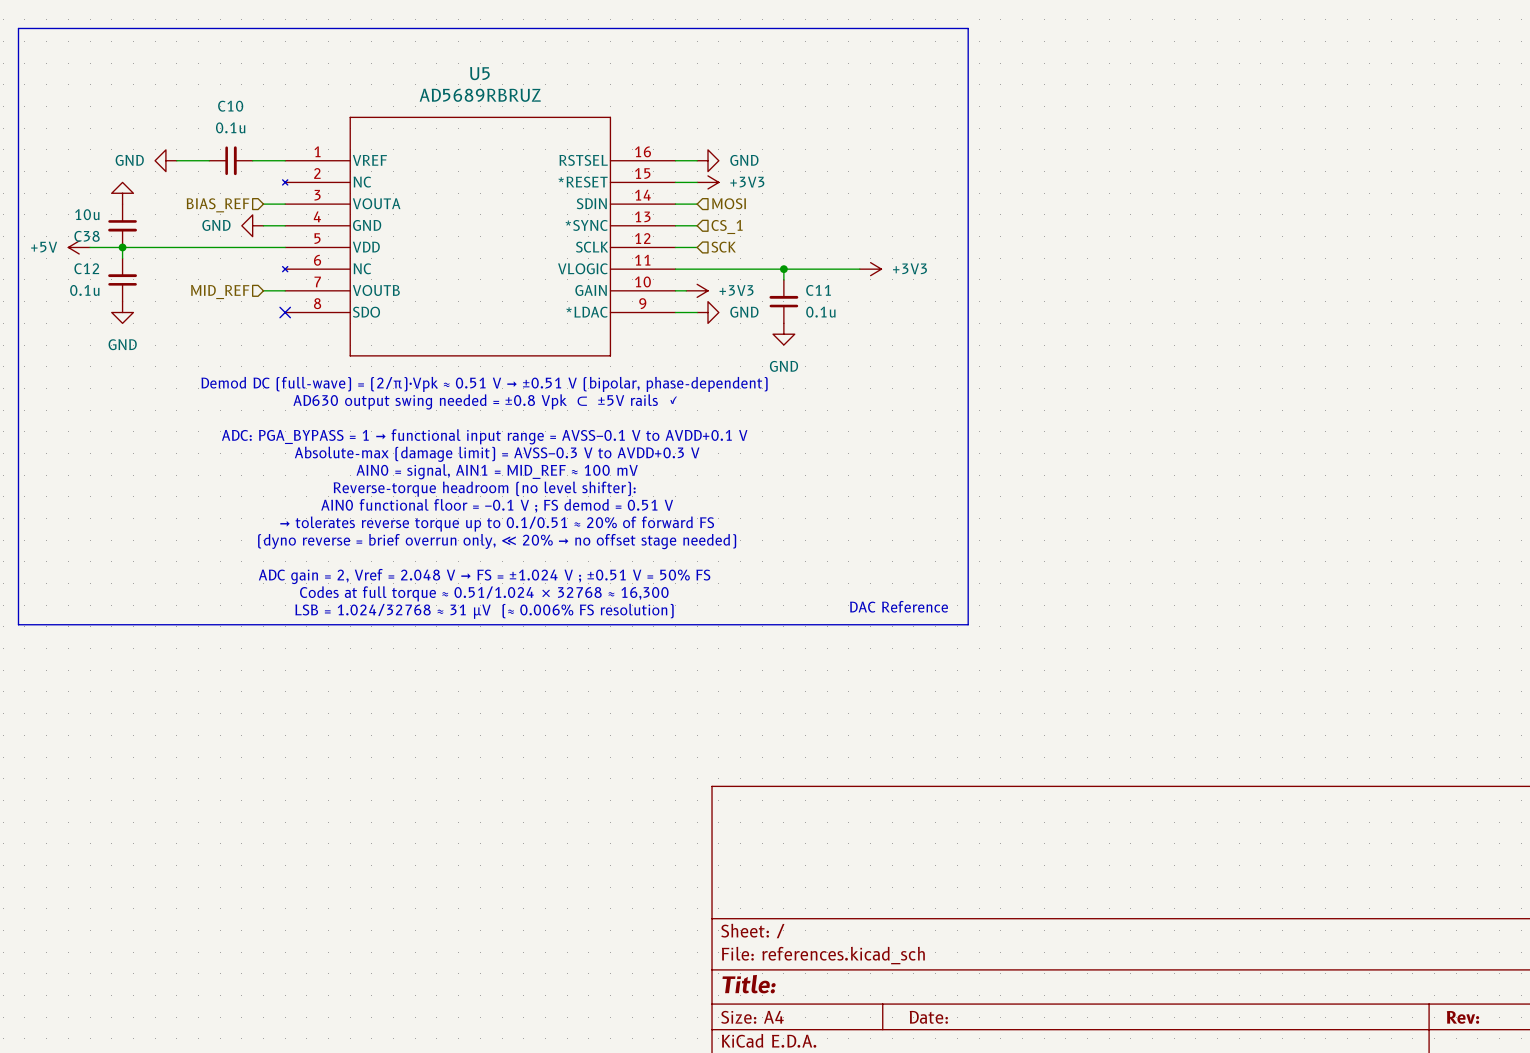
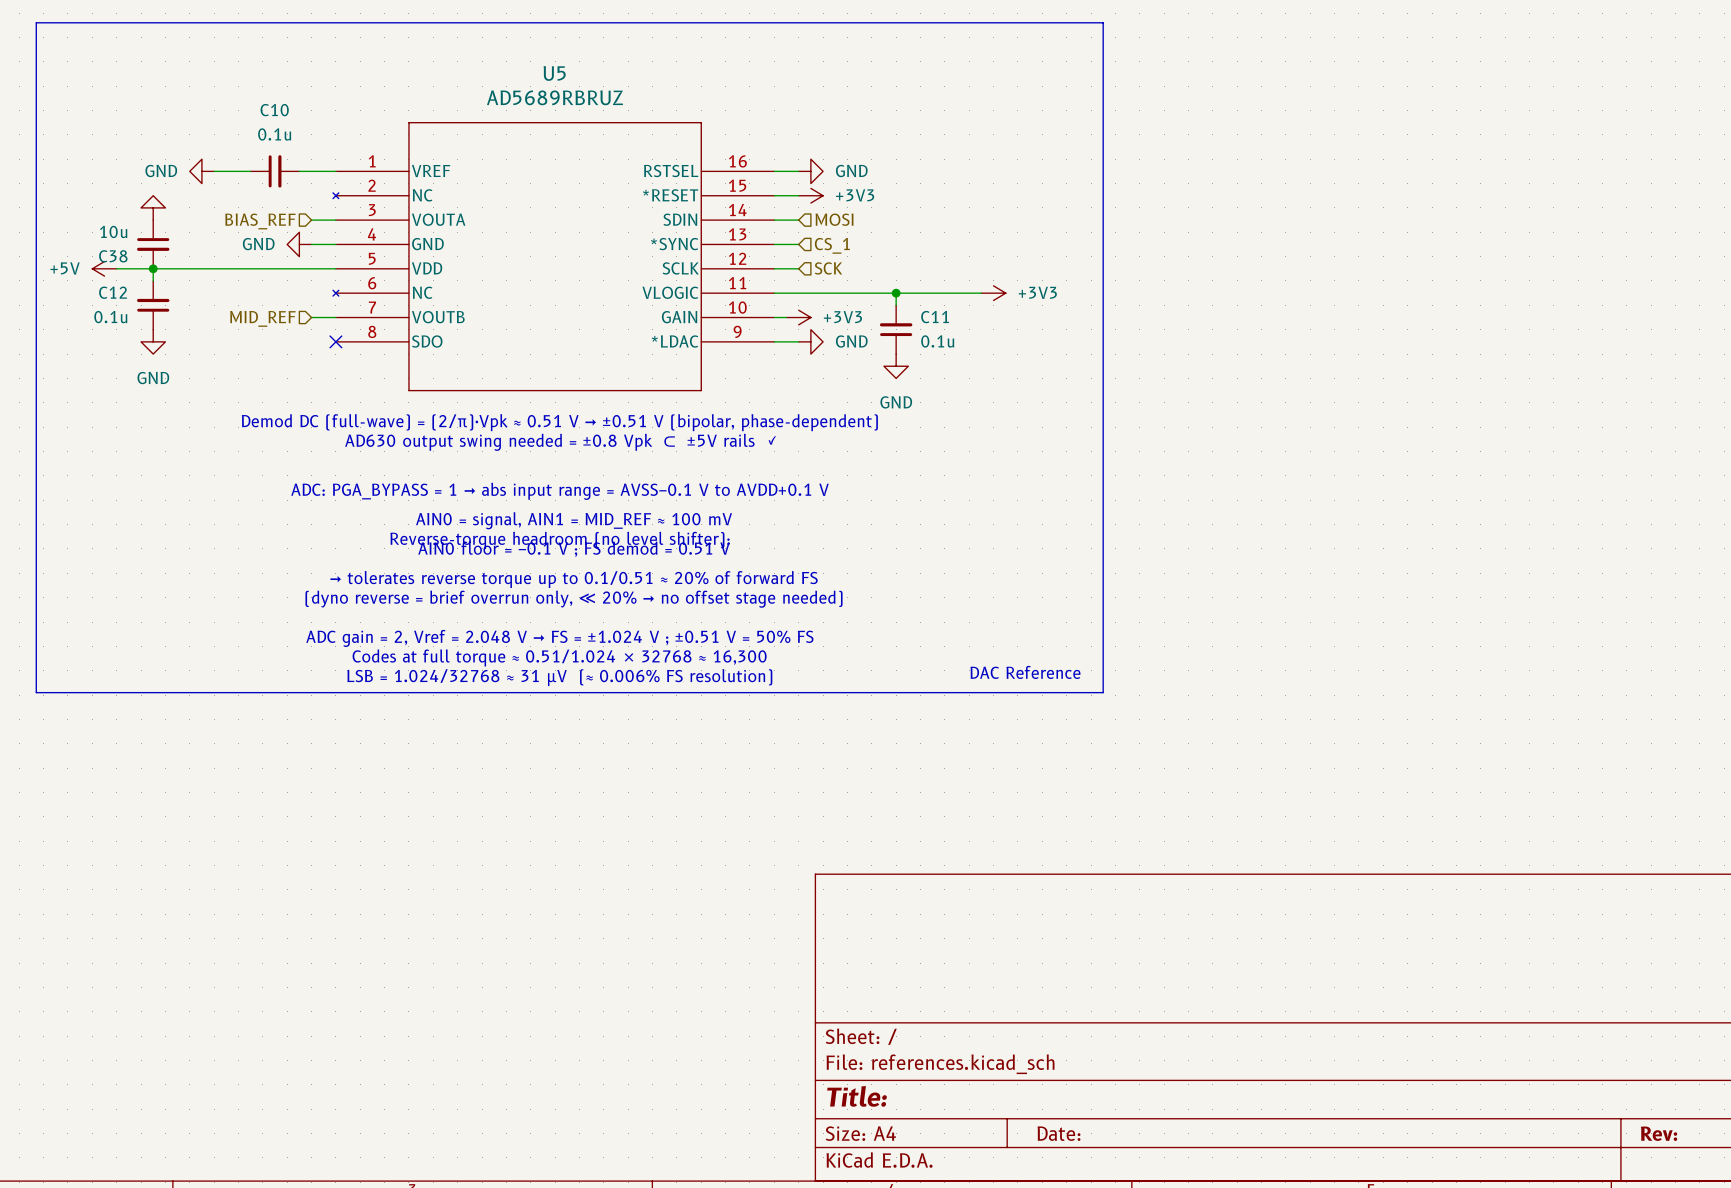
text: ADC: PGA_BYPASS = 1 → functional input range = AVSS−0.1 V to AVDD+0.1 V (484, 436) -> none
text: none -> ADC: PGA_BYPASS = 1 → abs input range = AVSS−0.1 V to AVDD+0.1 V (560, 491)
text: Absolute-max (damage limit) = AVSS−0.3 V to AVDD+0.3 V (497, 454) -> none
text: AIN0 functional floor = −0.1 V ; FS demod = 0.51 V (497, 505) -> AIN0 floor = −0.1 V ; FS demod = 0.51 V (574, 549)

